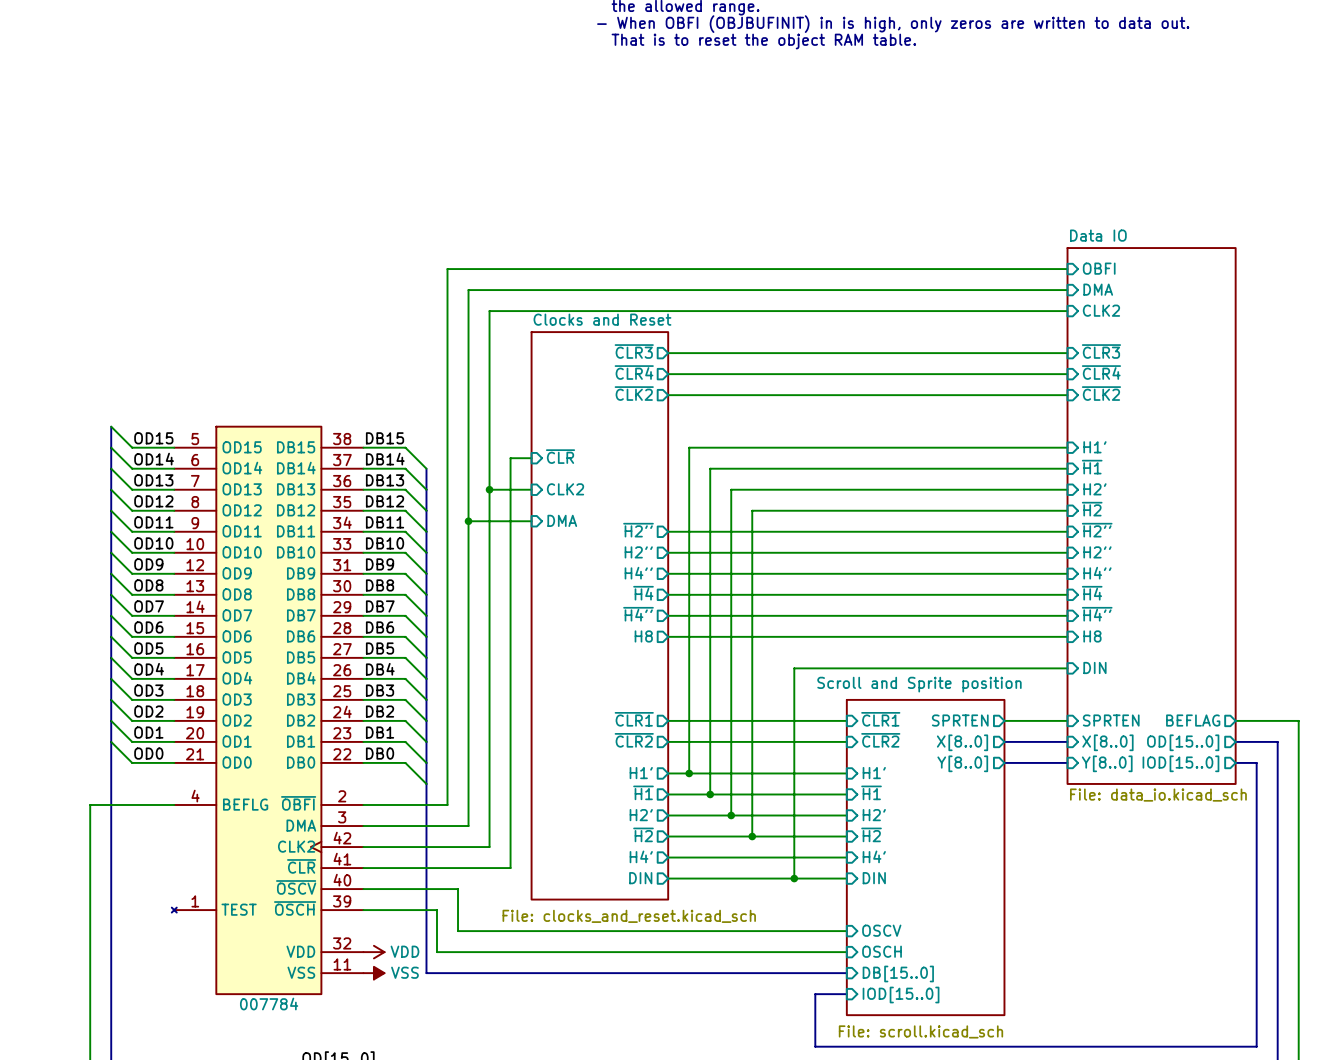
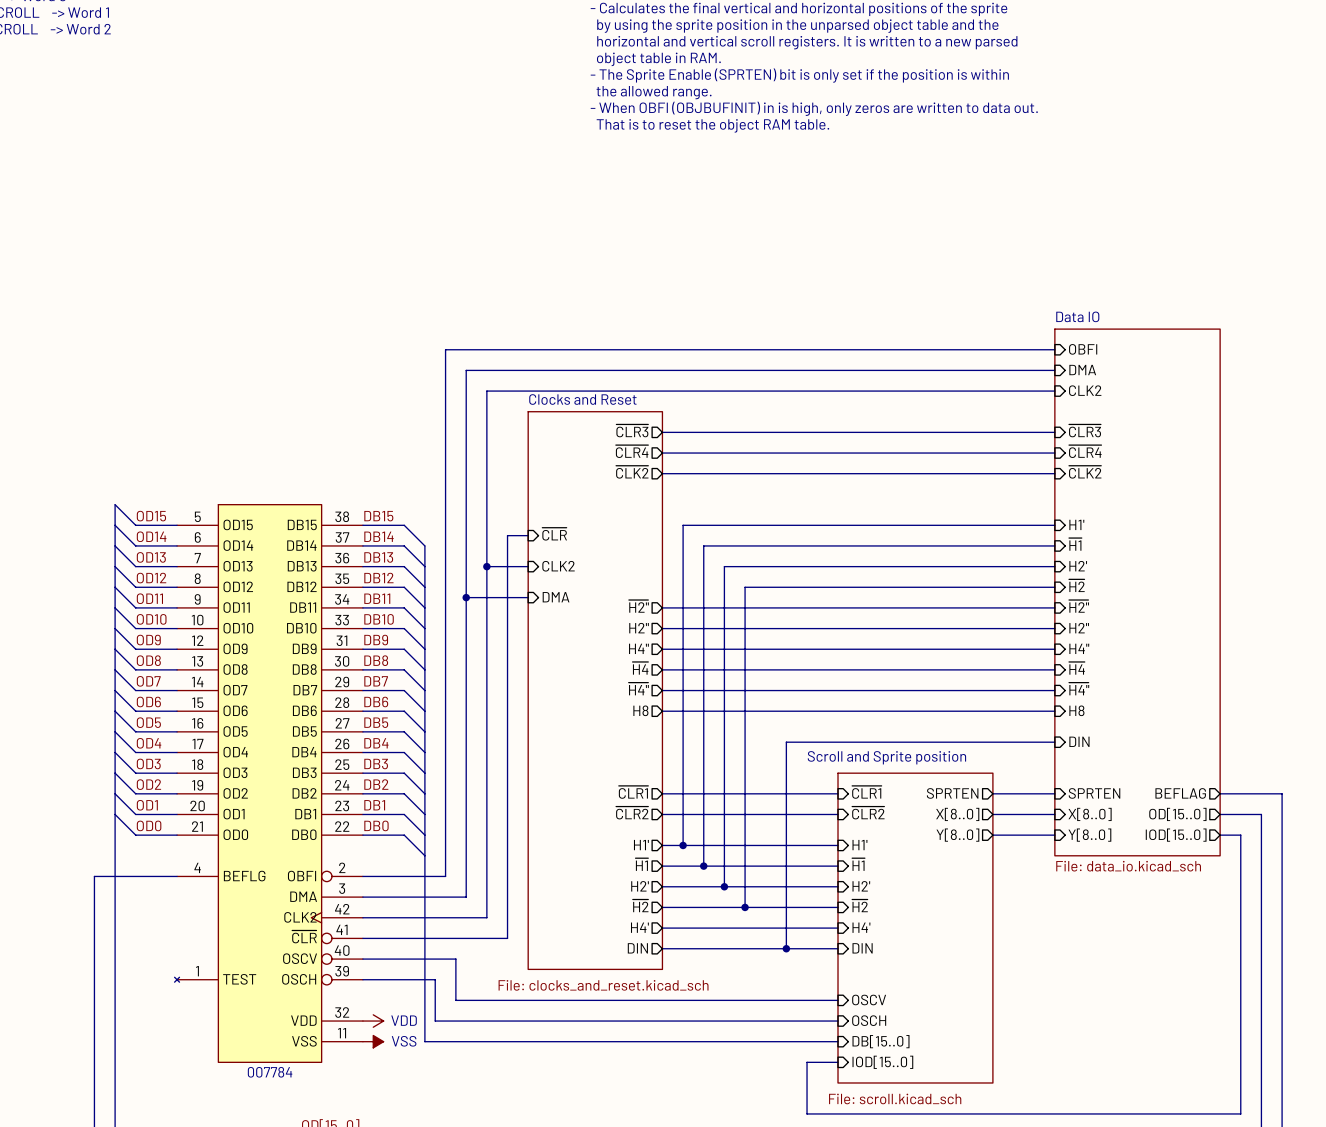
part symbol: [171, 426, 364, 995] -> [174, 504, 363, 1063]

